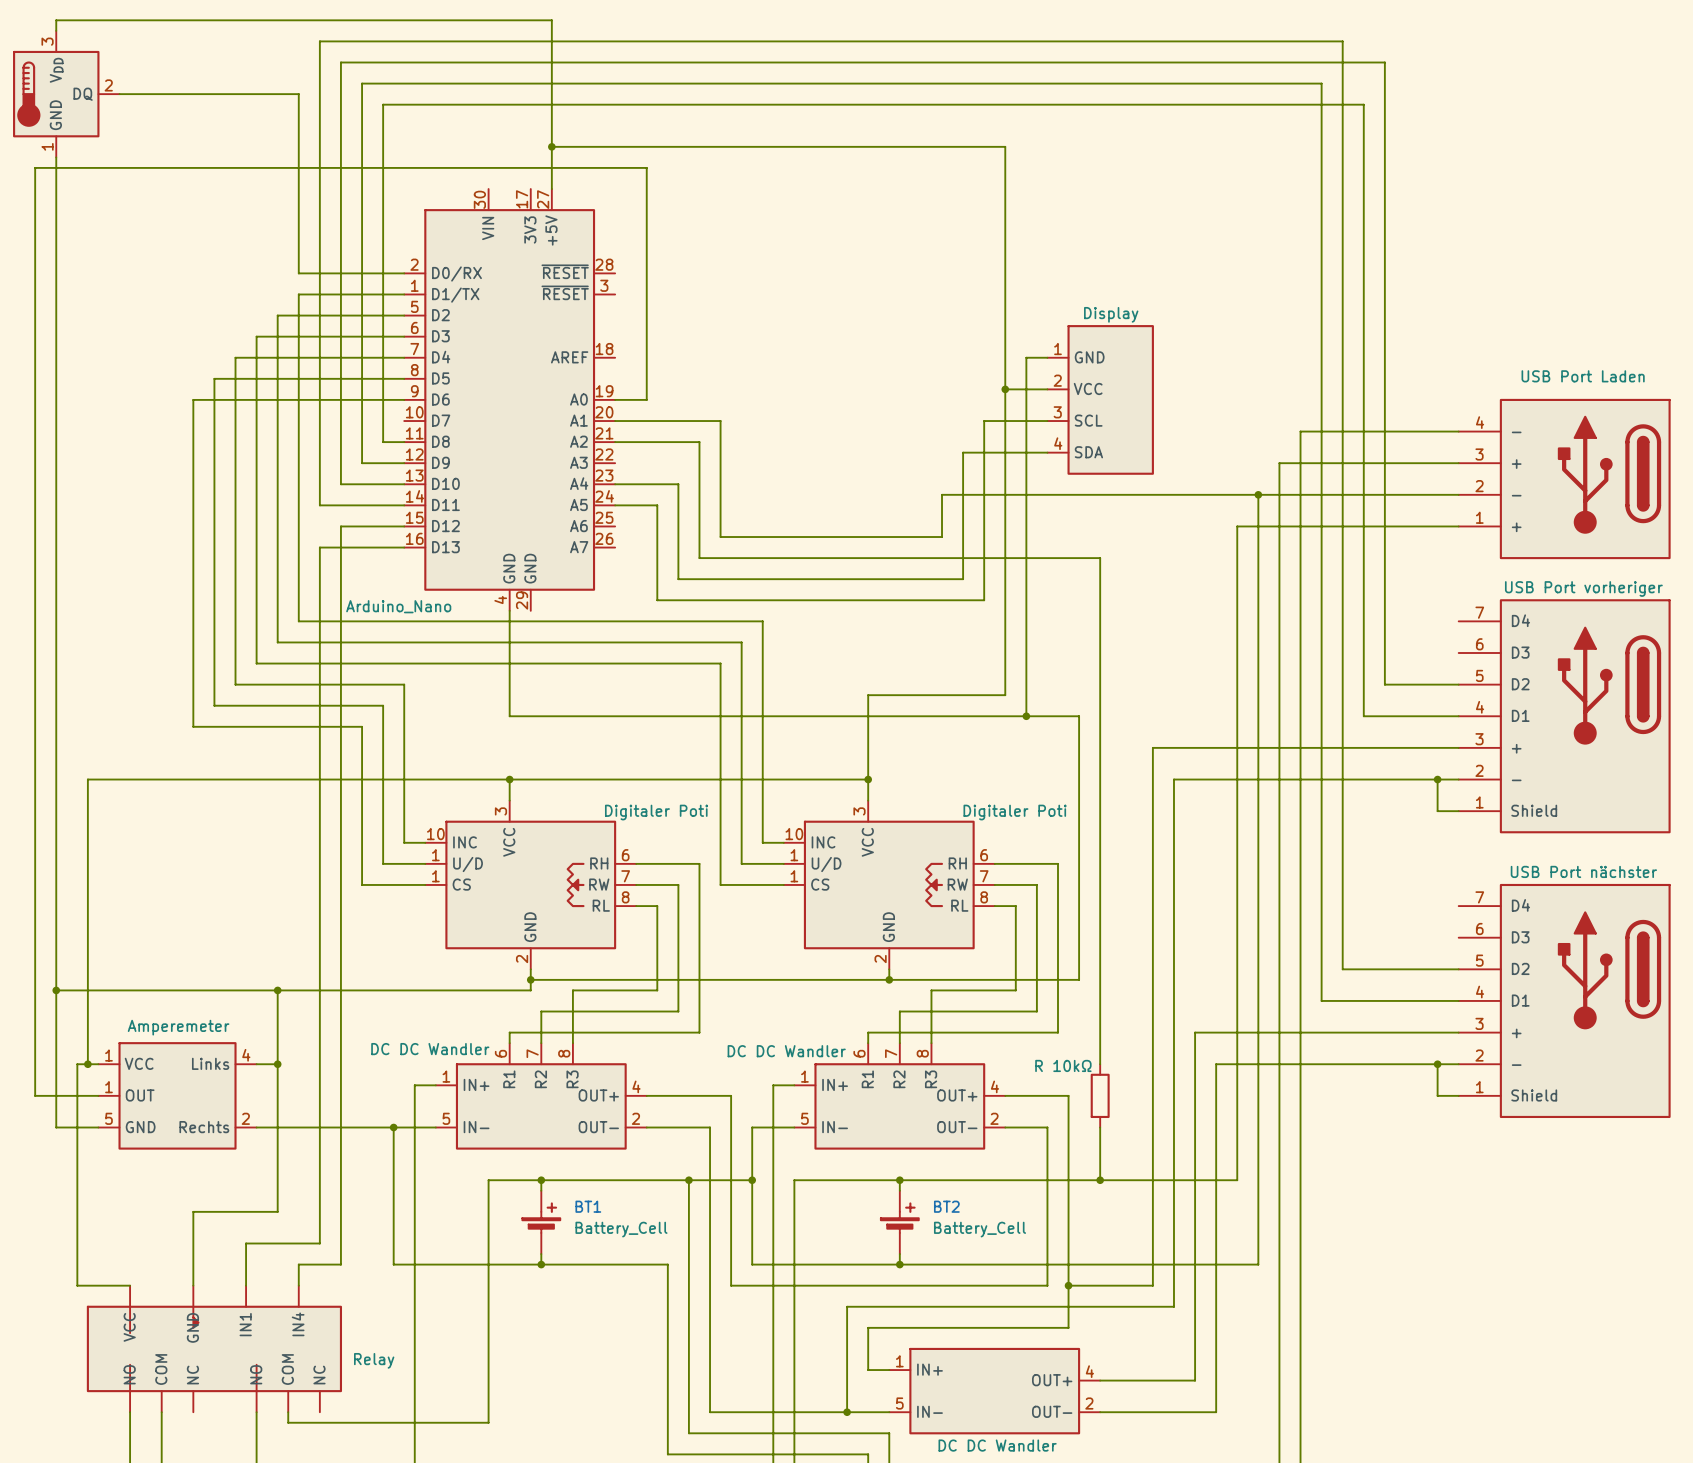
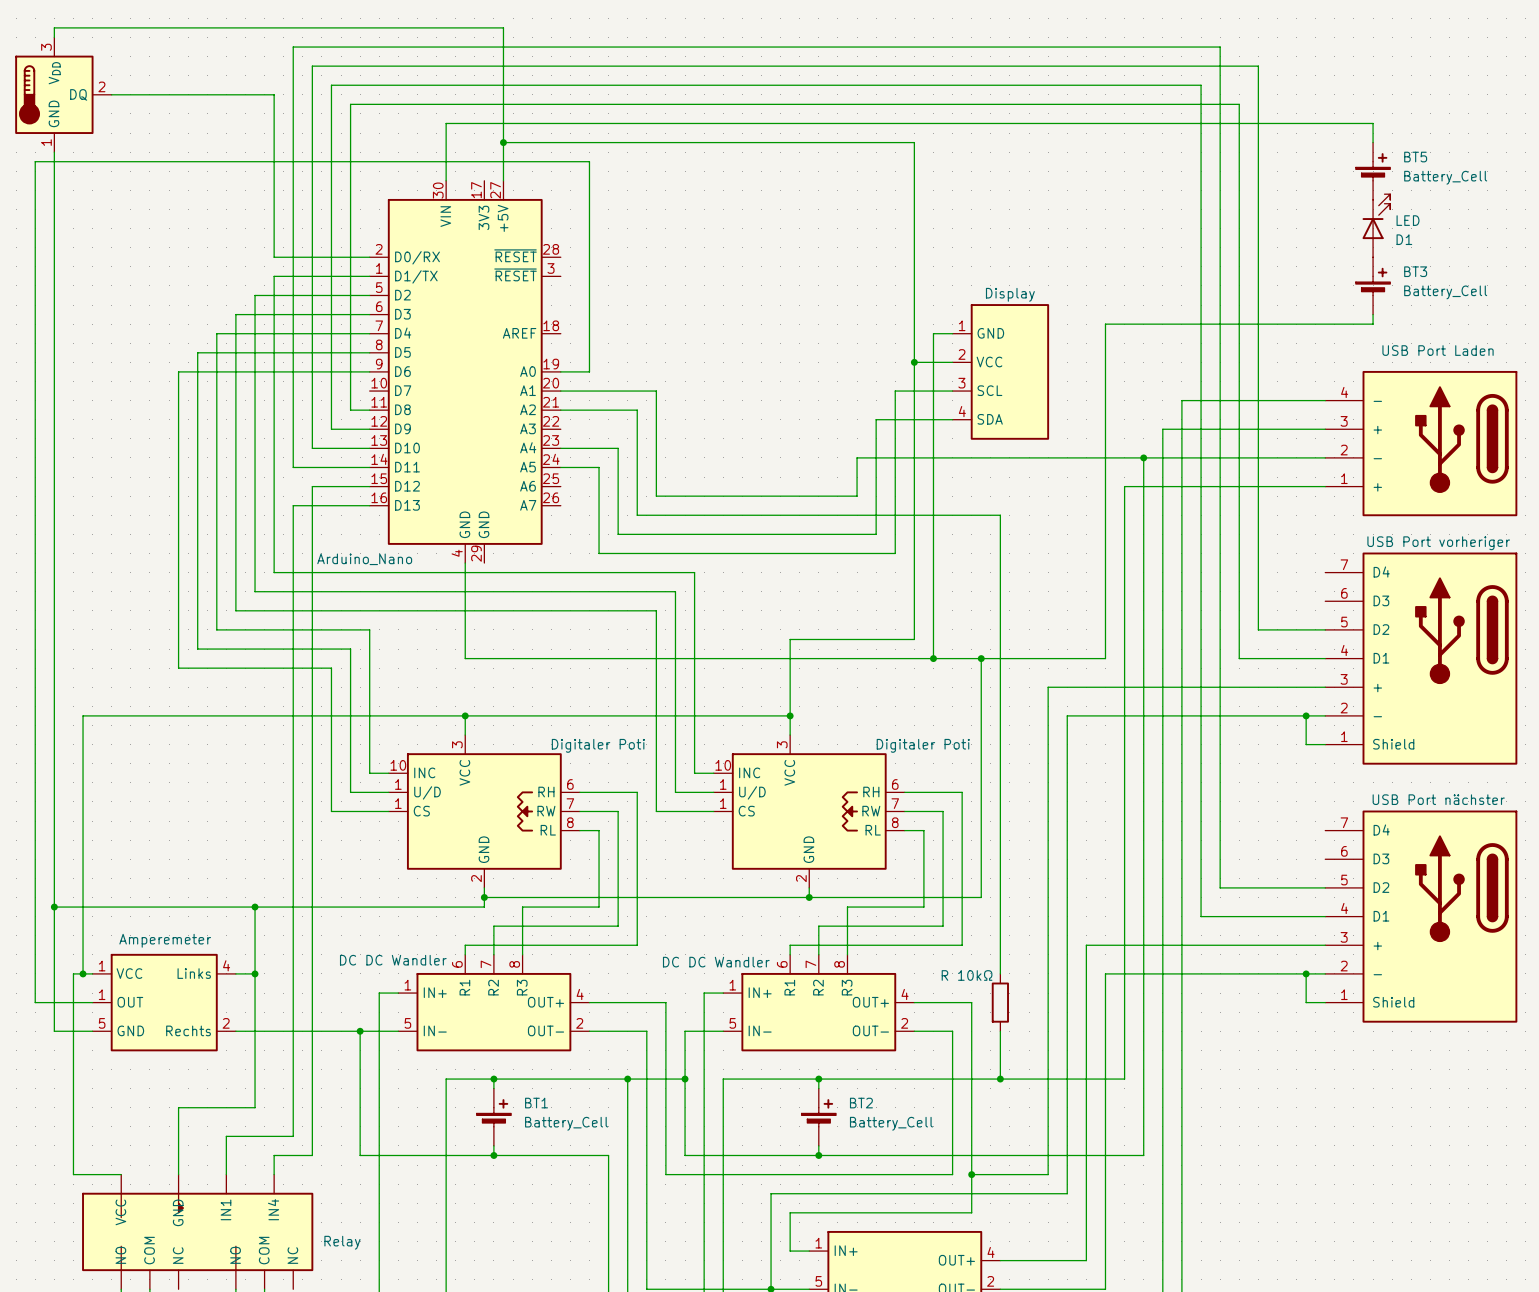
wire: none -> (1373, 142) (1373, 123) (446, 123) (446, 180)
BT5: none -> Battery_Cell (1373, 171)
D1: none -> LED (1376, 225)
BT3: none -> Battery_Cell (1373, 285)
wire: none -> (1373, 314) (1373, 324) (1105, 324) (1105, 658) (981, 658)
junction: none -> (981, 658)

